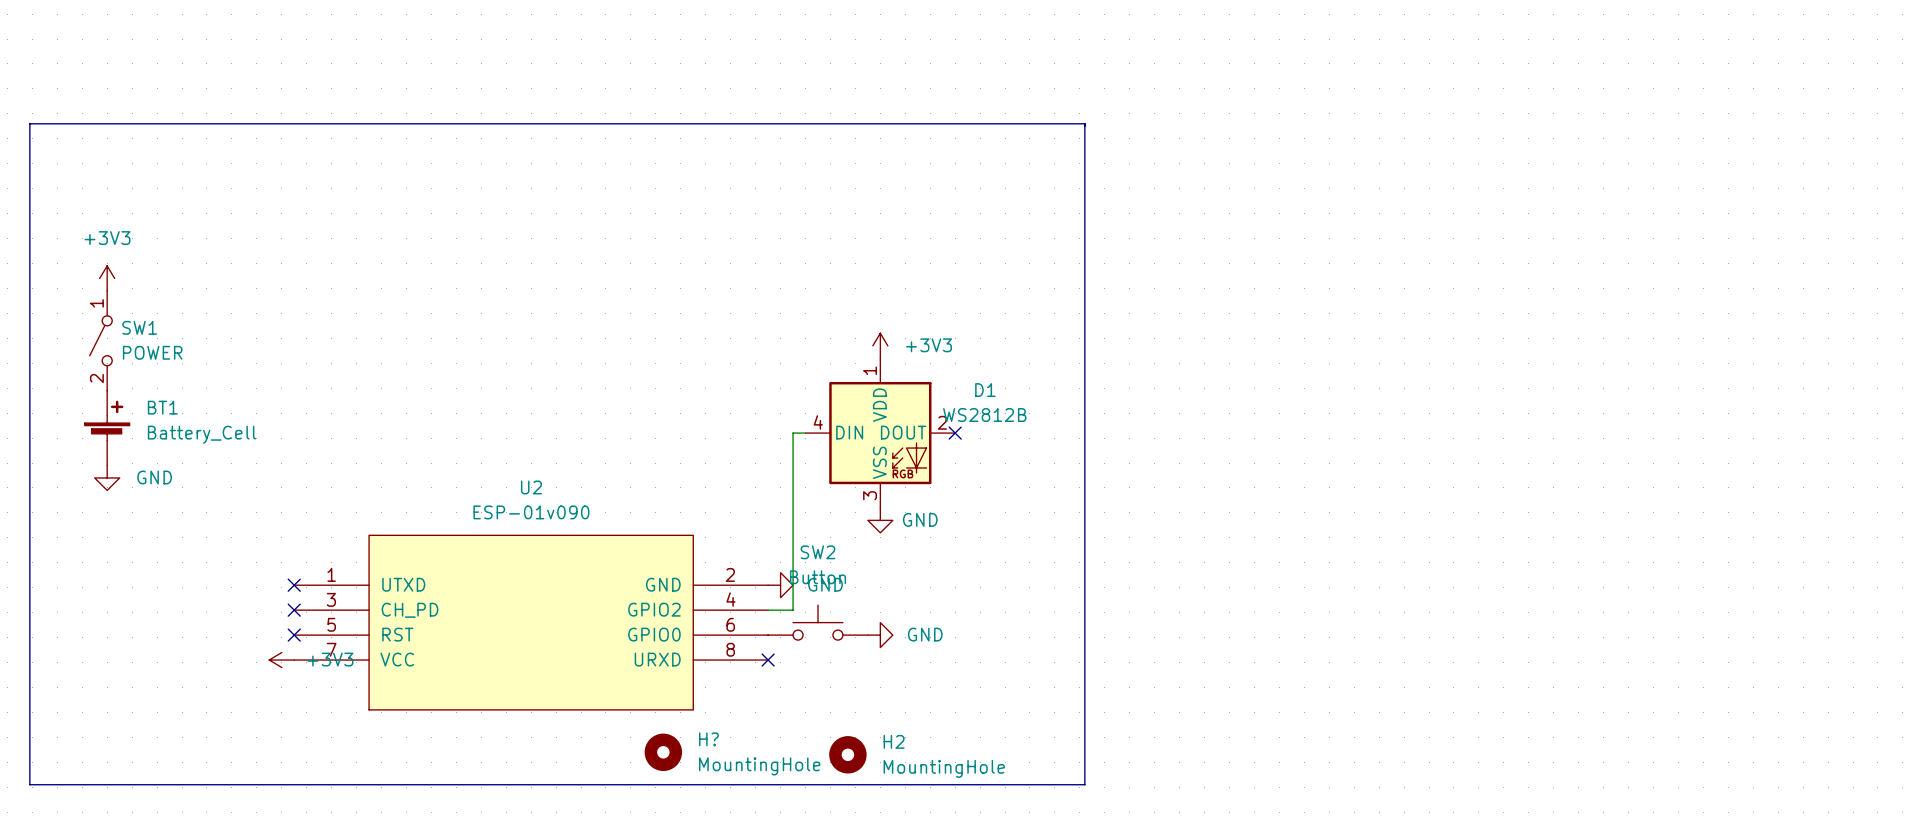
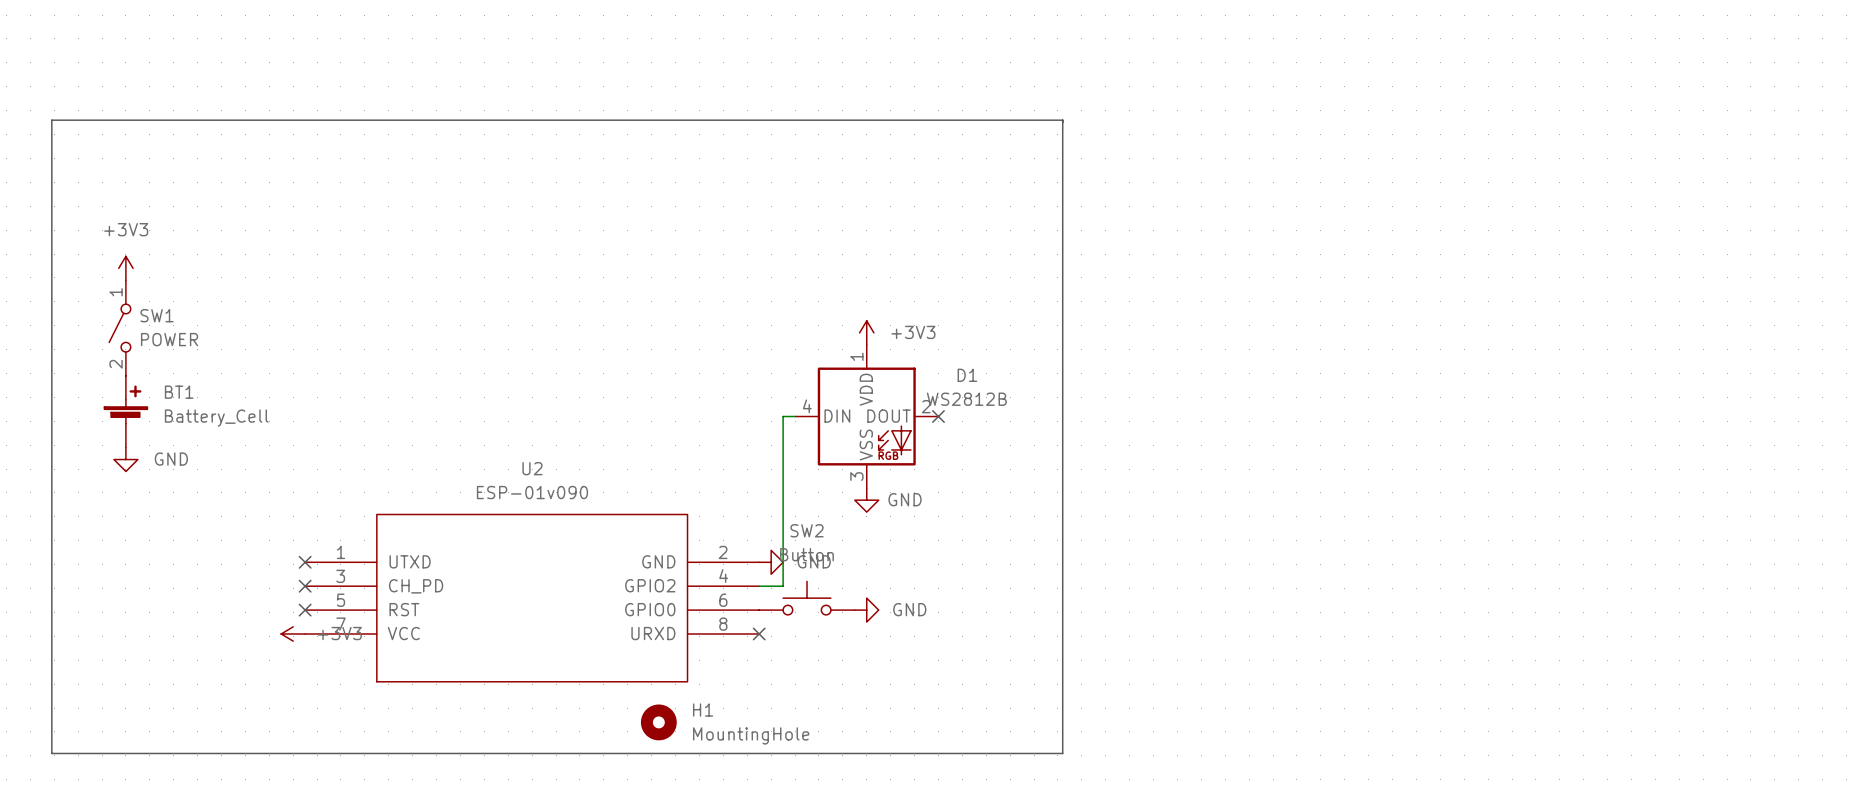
H? name: H? (708, 739) -> H1 (703, 710)
H2: MountingHole (847, 754) -> none

